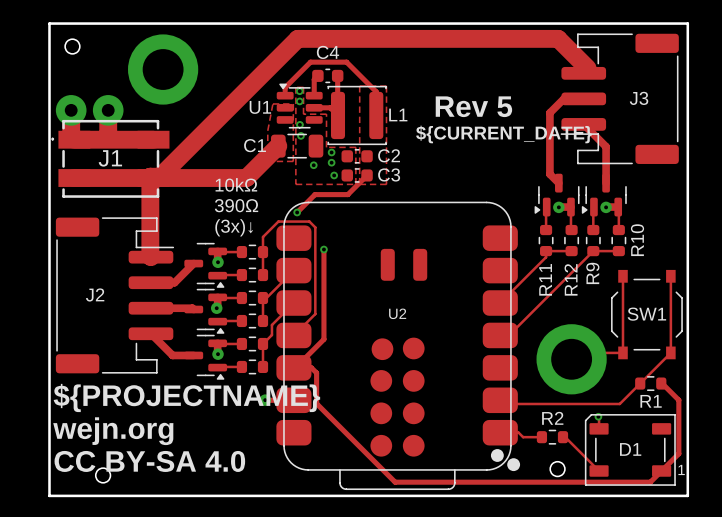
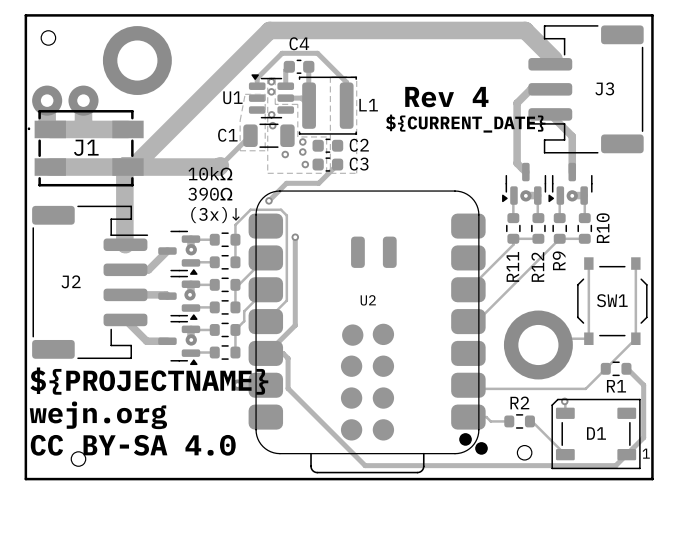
text: Rev 5 (473, 106) -> Rev 4 (446, 97)
track width: thick (278, 146) (247, 176) -> thin (250, 135) (220, 165)

